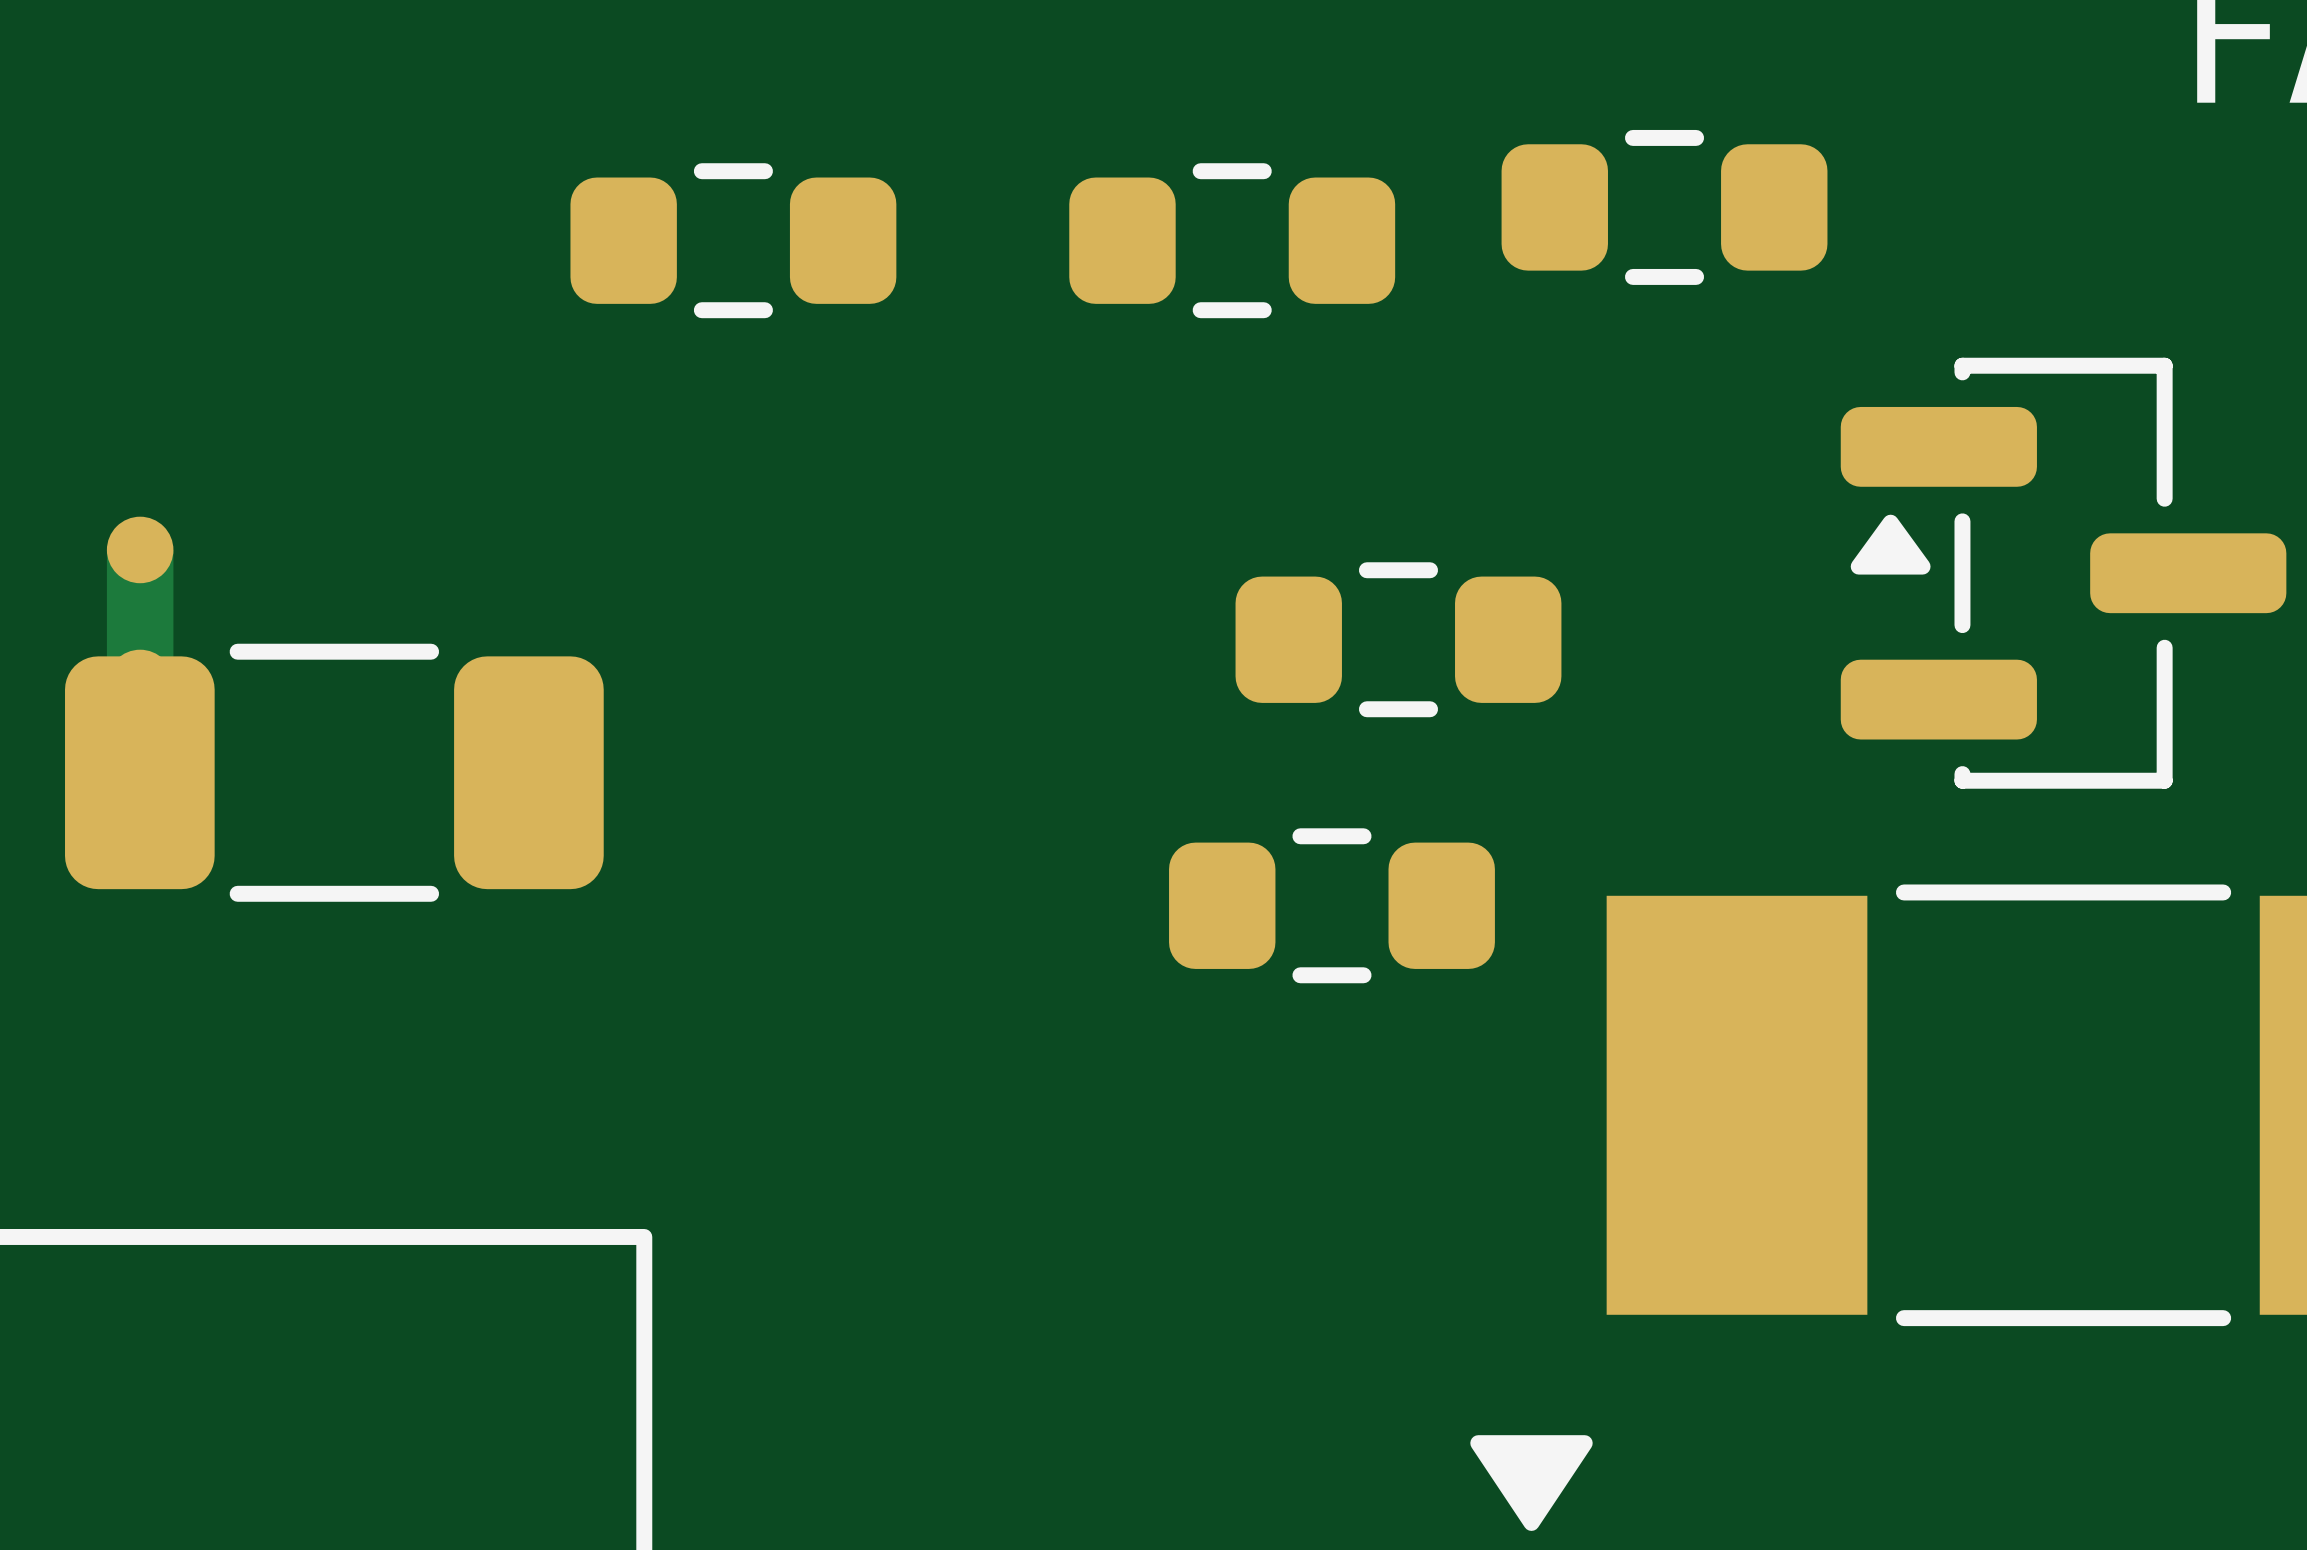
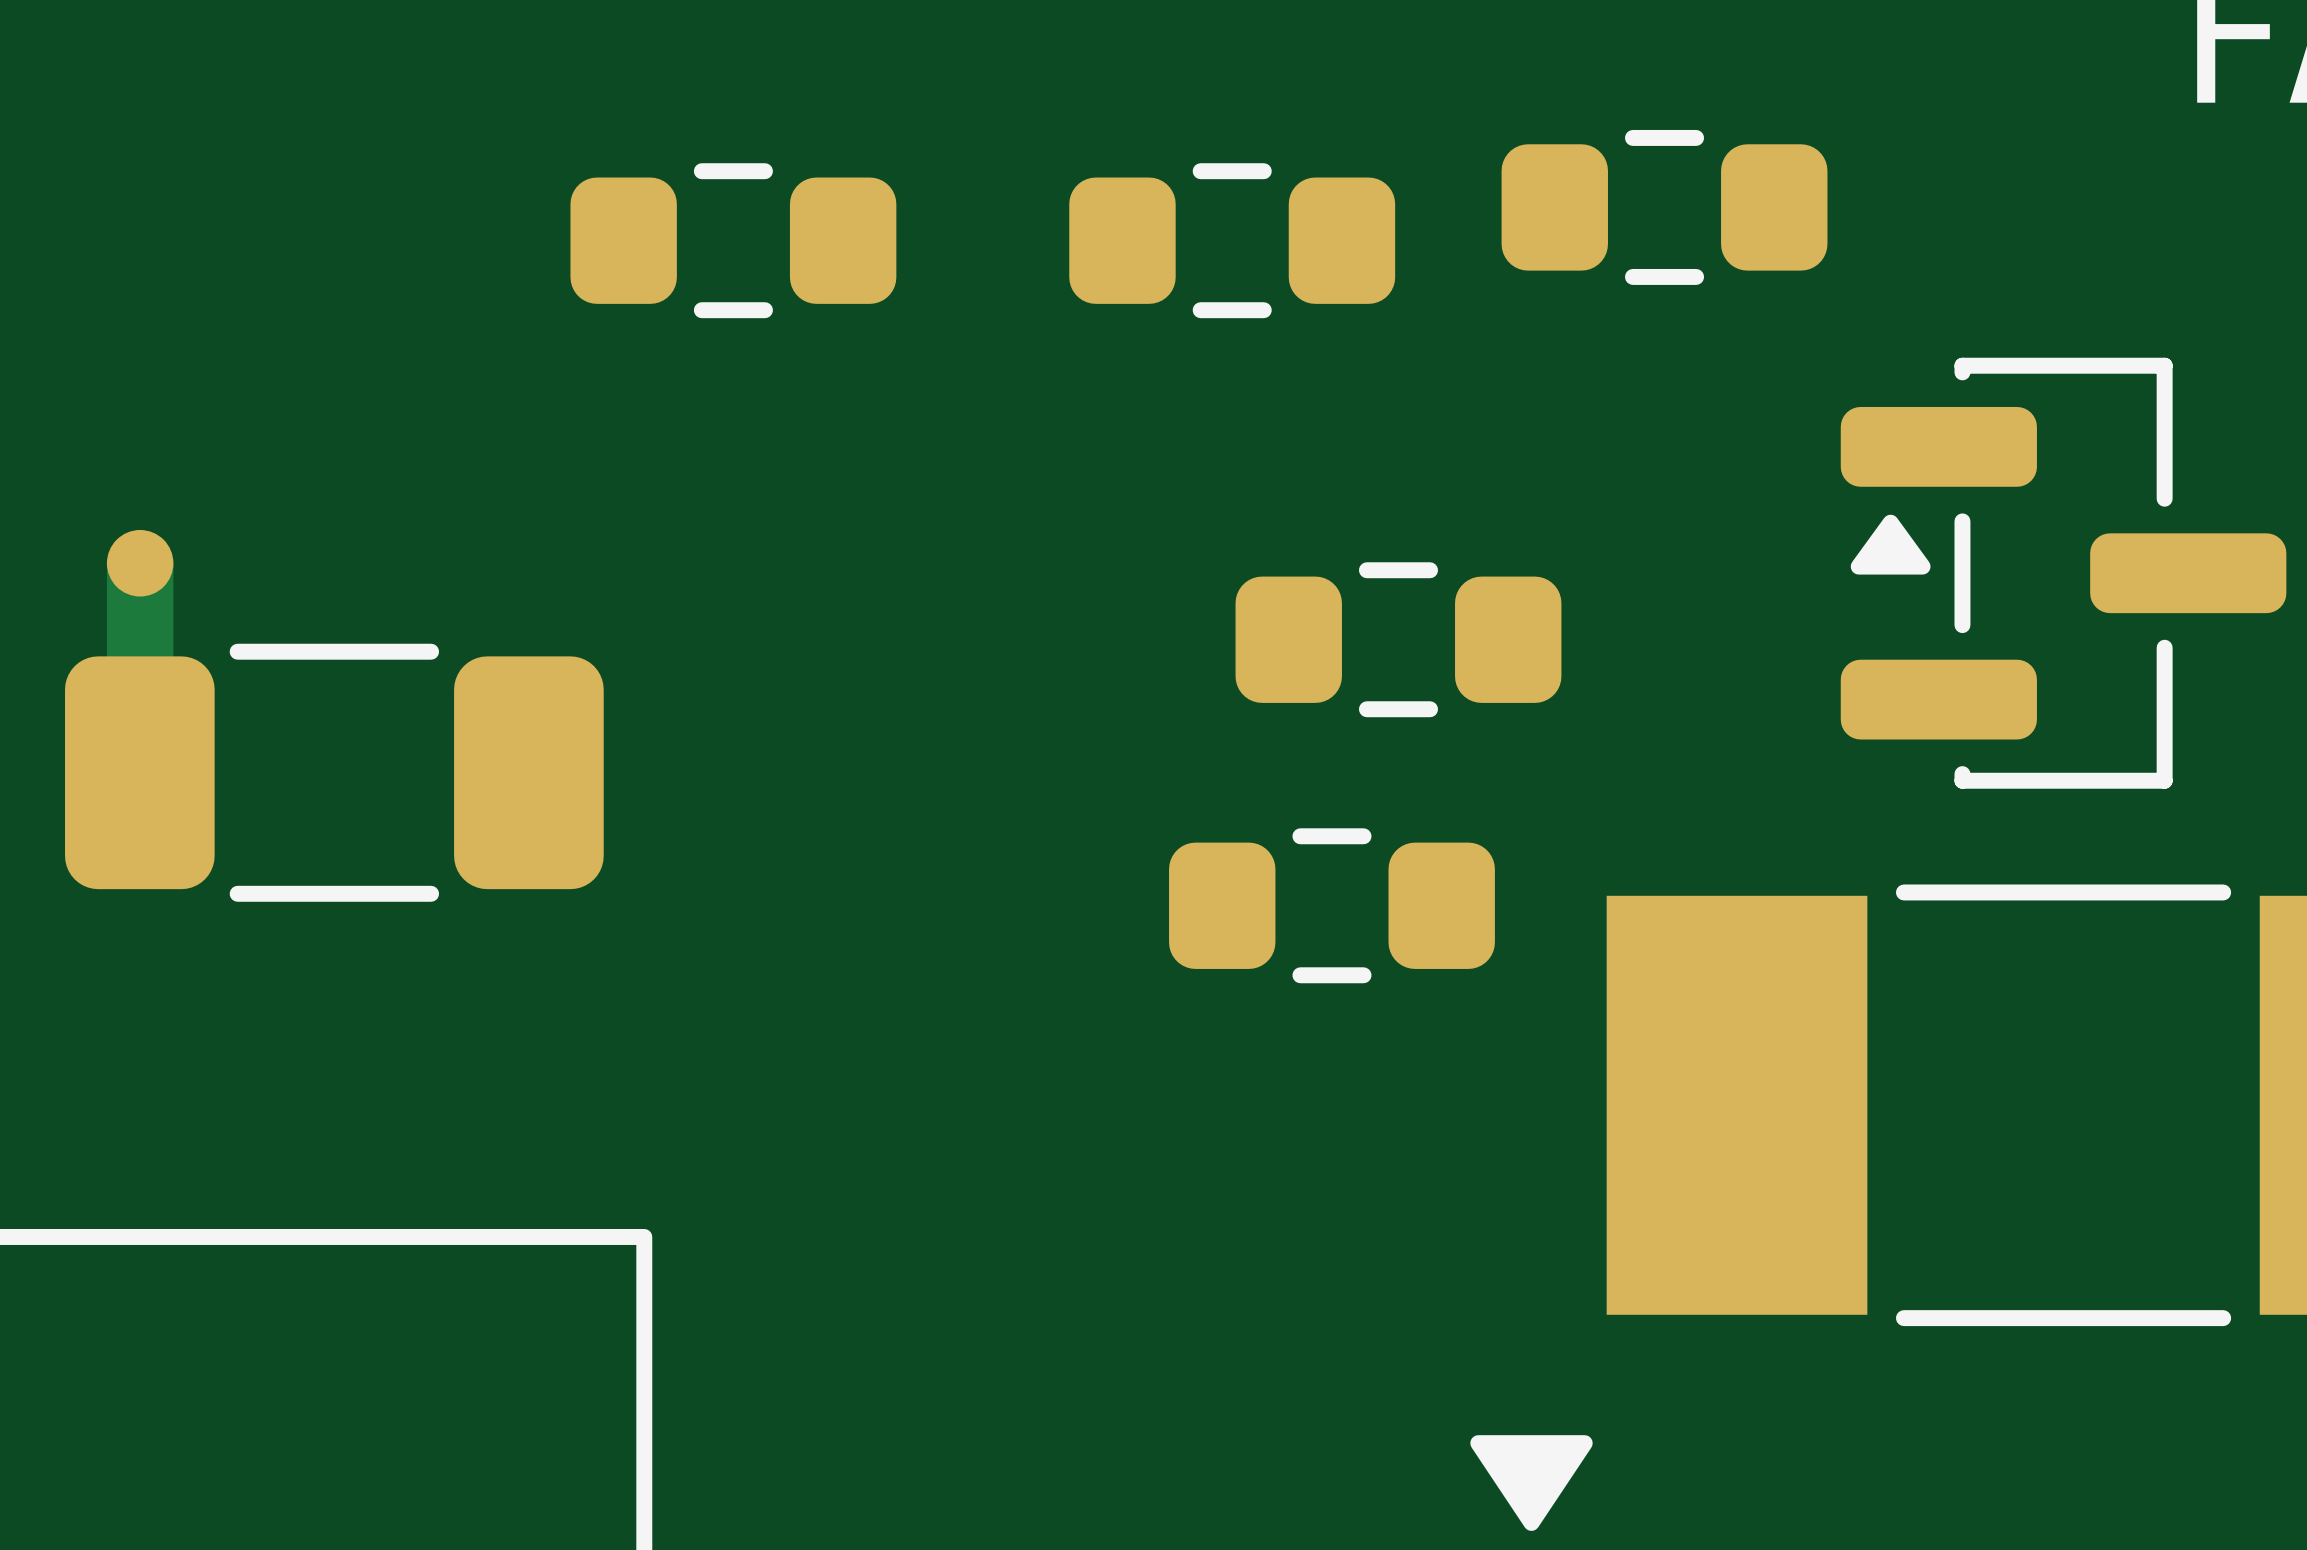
part position: (140, 616) -> (140, 629)

